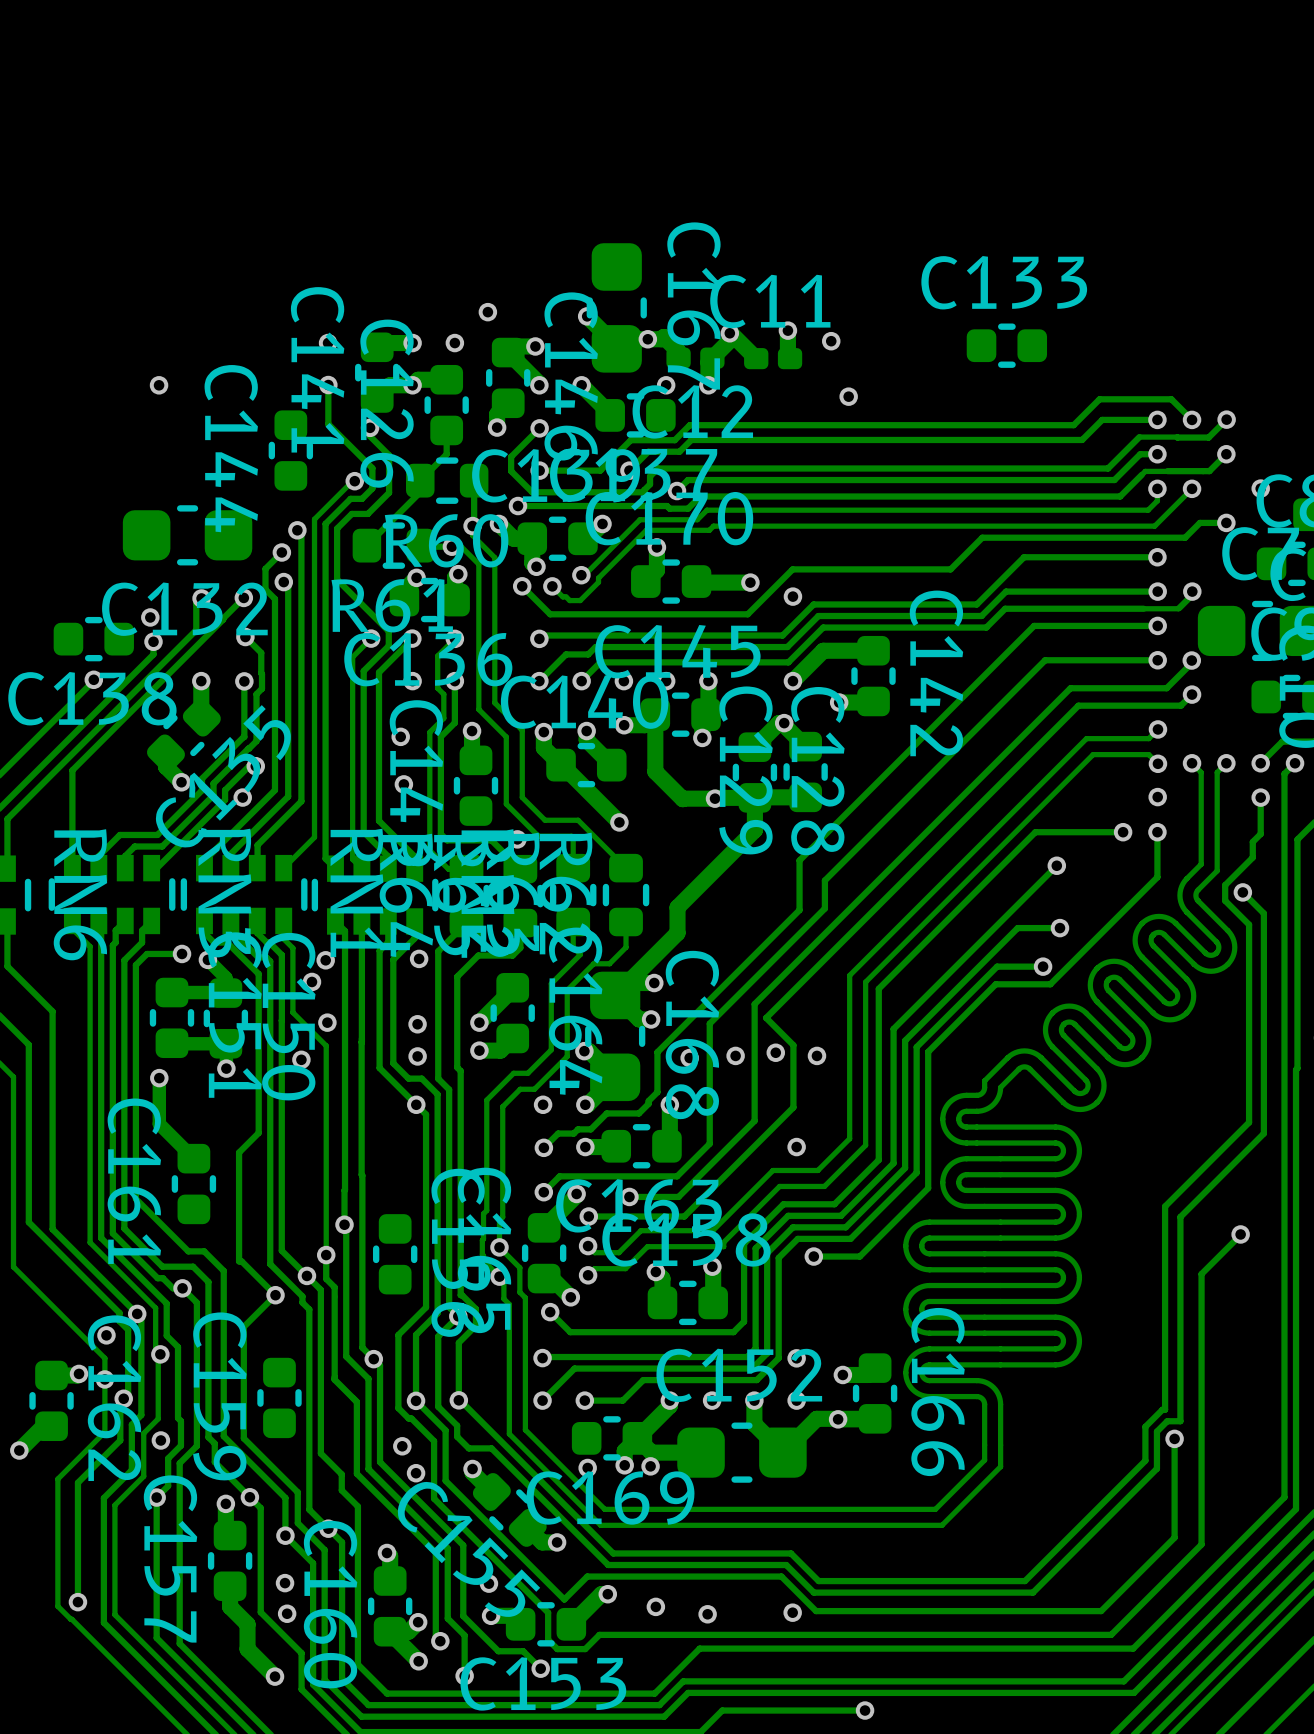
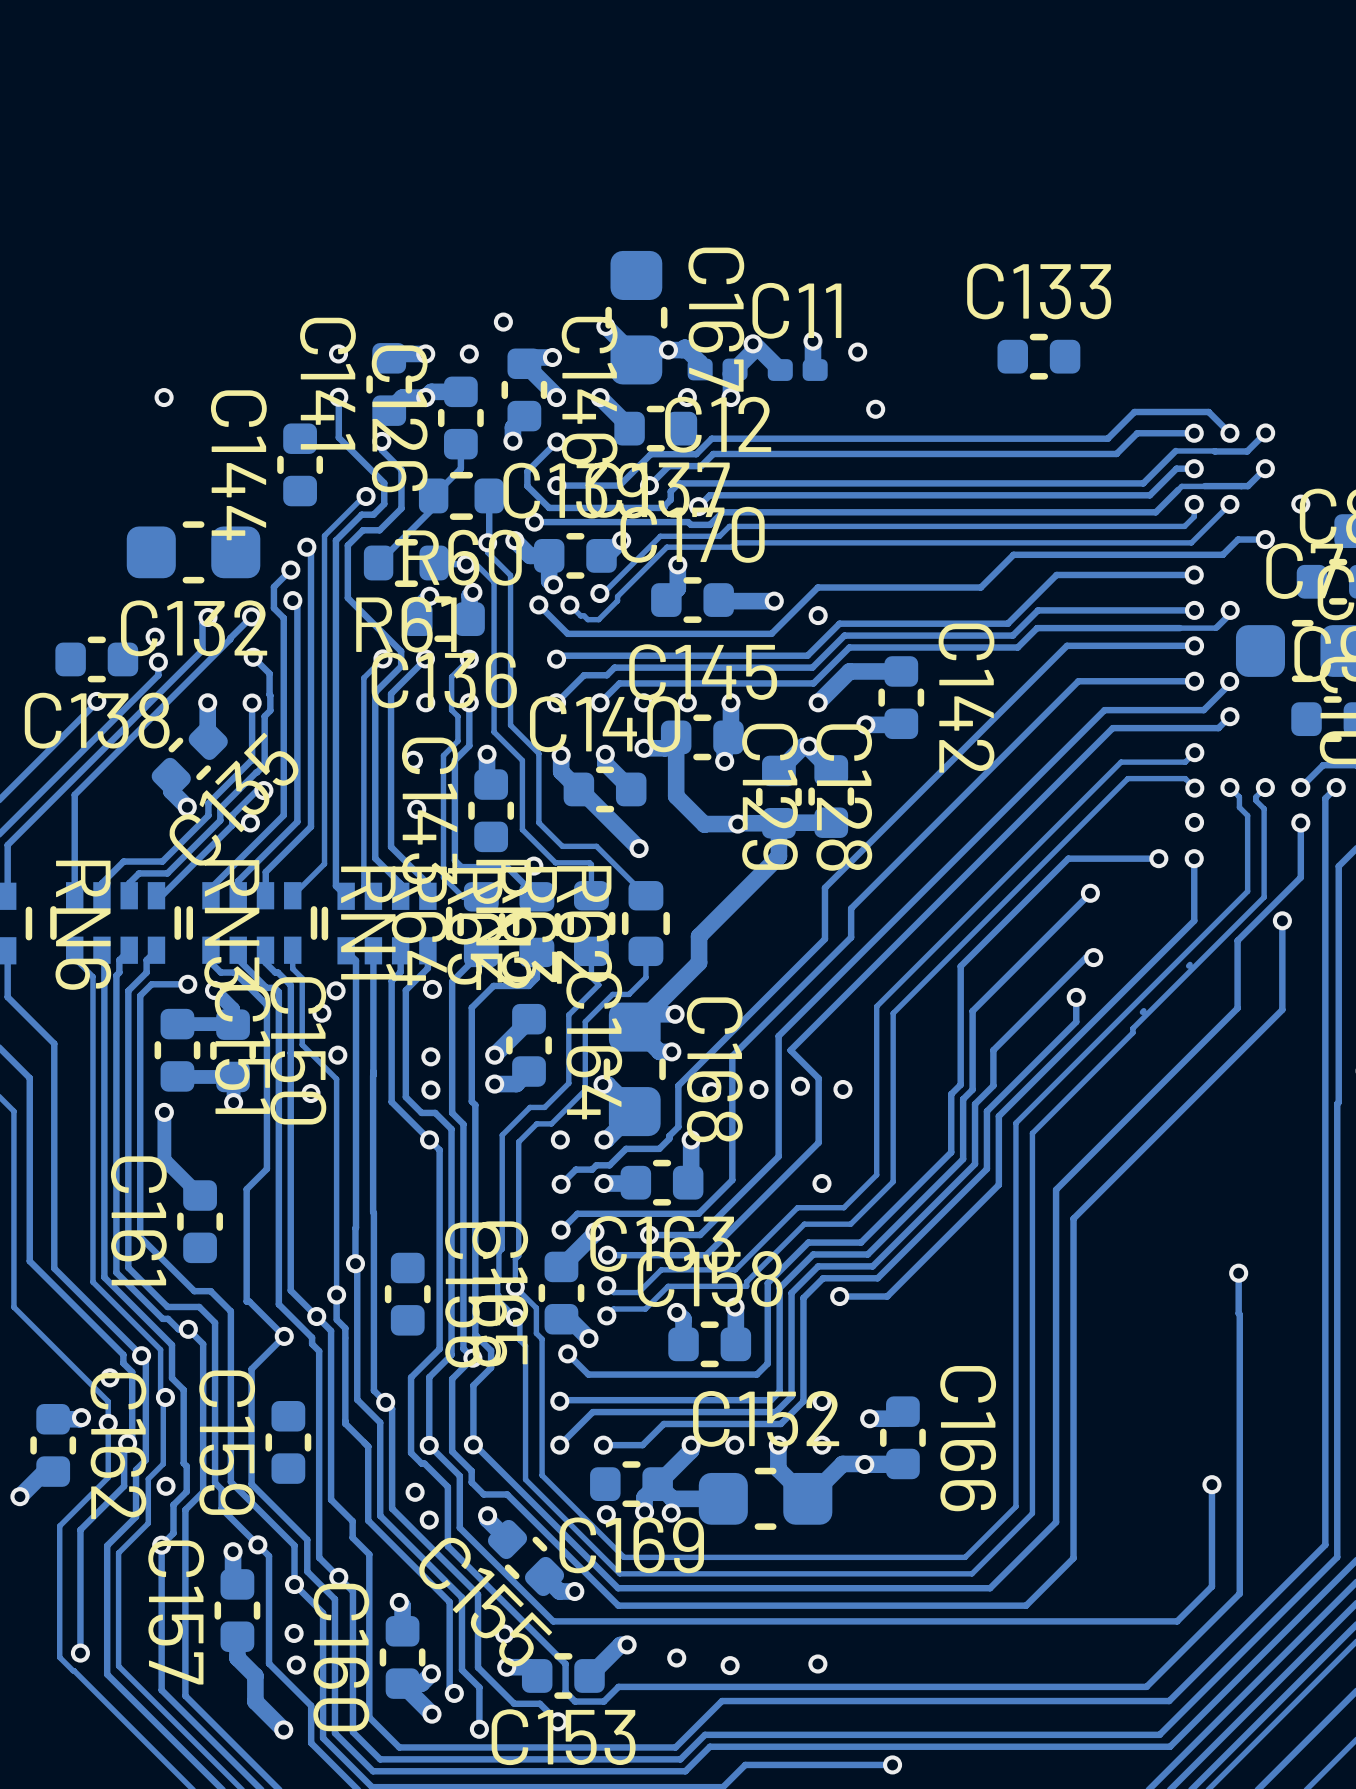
track: (1217, 775) (1217, 870) (1197, 890) (1195, 896) (1231, 935) (1234, 947) (1229, 961) (1217, 970) (1201, 969) (1163, 934) (1154, 933) (1151, 939) (1152, 945) (1190, 984) (1193, 996) (1191, 1005) (1181, 1016) (1172, 1019) (1163, 1019) (1153, 1012) (1119, 978) (1113, 977) (1108, 979) (1106, 984) (1107, 989) (1141, 1023) (1148, 1034) (1148, 1047) (1143, 1055) (1136, 1061) (1128, 1064) (1118, 1063) (1110, 1059) (1073, 1023) (1068, 1022) (1063, 1024) (1061, 1028) (1063, 1034) (1097, 1068) (1102, 1076) (1103, 1091) (1097, 1102) (1083, 1109) (1071, 1107) (1063, 1102) (1029, 1068) (1023, 1066) (1000, 1087) (998, 1097) (991, 1106) (982, 1110) (964, 1111) (959, 1116) (959, 1123) (965, 1126) (1060, 1127) (1074, 1136) (1079, 1148) (1078, 1158) (1074, 1165) (1060, 1174) (965, 1174) (961, 1177) (958, 1181) (960, 1187) (965, 1190) (1055, 1190) (1065, 1192) (1074, 1199) (1079, 1211) (1077, 1224) (1068, 1234) (1055, 1238) (929, 1238) (924, 1239) (922, 1243) (922, 1249) (928, 1253) (1058, 1253) (1070, 1259) (1077, 1267) (1079, 1277) (1077, 1287) (1070, 1296) (1060, 1300) (929, 1301) (922, 1305) (922, 1312) (928, 1317) (1058, 1317) (1065, 1319) (1074, 1326) (1078, 1335) (1078, 1348) (1070, 1359) (1060, 1364) (929, 1364) (922, 1369) (922, 1375) (927, 1380) (976, 1380) (987, 1382) (996, 1391) (1000, 1404) -> (1255, 800) (1264, 808) (1264, 897) (1132, 1028) (1132, 1032) (1032, 1133) (1032, 1449)
track: (1201, 782) (1201, 864) (1183, 883) (1180, 898) (1184, 909) (1217, 943) (1217, 952) (1212, 955) (1206, 954) (1168, 918) (1158, 916) (1147, 919) (1136, 931) (1135, 940) (1136, 949) (1142, 957) (1176, 991) (1177, 996) (1175, 1001) (1170, 1003) (1165, 1002) (1128, 966) (1120, 962) (1111, 961) (1102, 964) (1095, 970) (1090, 981) (1091, 991) (1097, 1001) (1131, 1035) (1132, 1041) (1130, 1046) (1125, 1048) (1120, 1046) (1086, 1013) (1075, 1006) (1066, 1006) (1057, 1009) (1047, 1020) (1045, 1033) (1048, 1041) (1086, 1080) (1088, 1085) (1085, 1091) (1081, 1093) (1076, 1092) (1038, 1055) (1030, 1051) (1021, 1051) (1009, 1055) (984, 1080) (984, 1089) (981, 1093) (956, 1097) (949, 1102) (944, 1111) (942, 1121) (945, 1129) (949, 1136) (958, 1141) (1056, 1143) (1061, 1145) (1063, 1149) (1061, 1155) (1056, 1158) (961, 1159) (947, 1167) (942, 1182) (947, 1197) (958, 1205) (1056, 1206) (1061, 1208) (1063, 1213) (1059, 1221) (926, 1222) (914, 1227) (907, 1238) (905, 1248) (909, 1258) (916, 1266) (924, 1269) (1055, 1269) (1062, 1274) (1062, 1281) (1056, 1285) (926, 1285) (916, 1289) (909, 1296) (905, 1306) (908, 1319) (914, 1327) (924, 1332) (1055, 1333) (1061, 1336) (1062, 1344) (1056, 1348) (926, 1349) (916, 1352) (909, 1360) (906, 1367) (906, 1378) (909, 1385) (916, 1392) (926, 1396) (977, 1396) (983, 1399) (984, 1404) -> (1239, 807) (1247, 815) (1247, 891) (1015, 1123) (1015, 1449)
track: (1260, 834) (1252, 841) (1252, 857) (1225, 885) (1225, 900) (1249, 924) (1249, 1122) (1165, 1206) (1165, 1409) (1162, 1409) (1145, 1426) (1145, 1460) (1025, 1581) (818, 1581) (791, 1553) (613, 1553) (599, 1539) -> (1300, 860) (1300, 877) (1237, 940) (1237, 1008) (1056, 1189) (1056, 1522) (990, 1588) (618, 1588)
track: (1157, 877) (1050, 984) (995, 984) (928, 1051) (928, 1188) -> (1194, 905) (1194, 920) (998, 1116) (998, 1184) (957, 1226)
track: (1242, 892) (1263, 913) (1263, 1133) (1180, 1217) (1180, 1421) (1167, 1421) (1156, 1431) (1156, 1468) (1033, 1592) (813, 1592) (786, 1565) (608, 1565) (599, 1556) -> (1282, 921) (1282, 1009) (1073, 1218) (1073, 1558) (1026, 1605) (618, 1605)
track: (1052, 928) (1017, 928) (905, 1040) (905, 1168) -> (1086, 957) (993, 1050) (993, 1085) (975, 1104) (975, 1164) (933, 1205)
track: (931, 936) (878, 988) (878, 1159) -> (960, 966) (960, 1084) (951, 1094) (951, 1152) (906, 1196)
track: (1043, 966) (997, 966) (916, 1047) (916, 1172) -> (1076, 997) (1076, 1021) (986, 1111) (986, 1168) (945, 1210)
track: (942, 979) (893, 1028) (893, 1163) -> (972, 1011) (972, 1089) (963, 1099) (963, 1159) (922, 1200)
track: (1240, 1234) (1201, 1274) -> (1235, 1273) (1238, 1273) (1239, 1314)
via position: (1240, 1234) -> (1238, 1273)
track: (1140, 1571) (1101, 1611) (816, 1611) (781, 1576) (587, 1576) (564, 1599) (536, 1571) -> (1177, 1621) (553, 1621)

